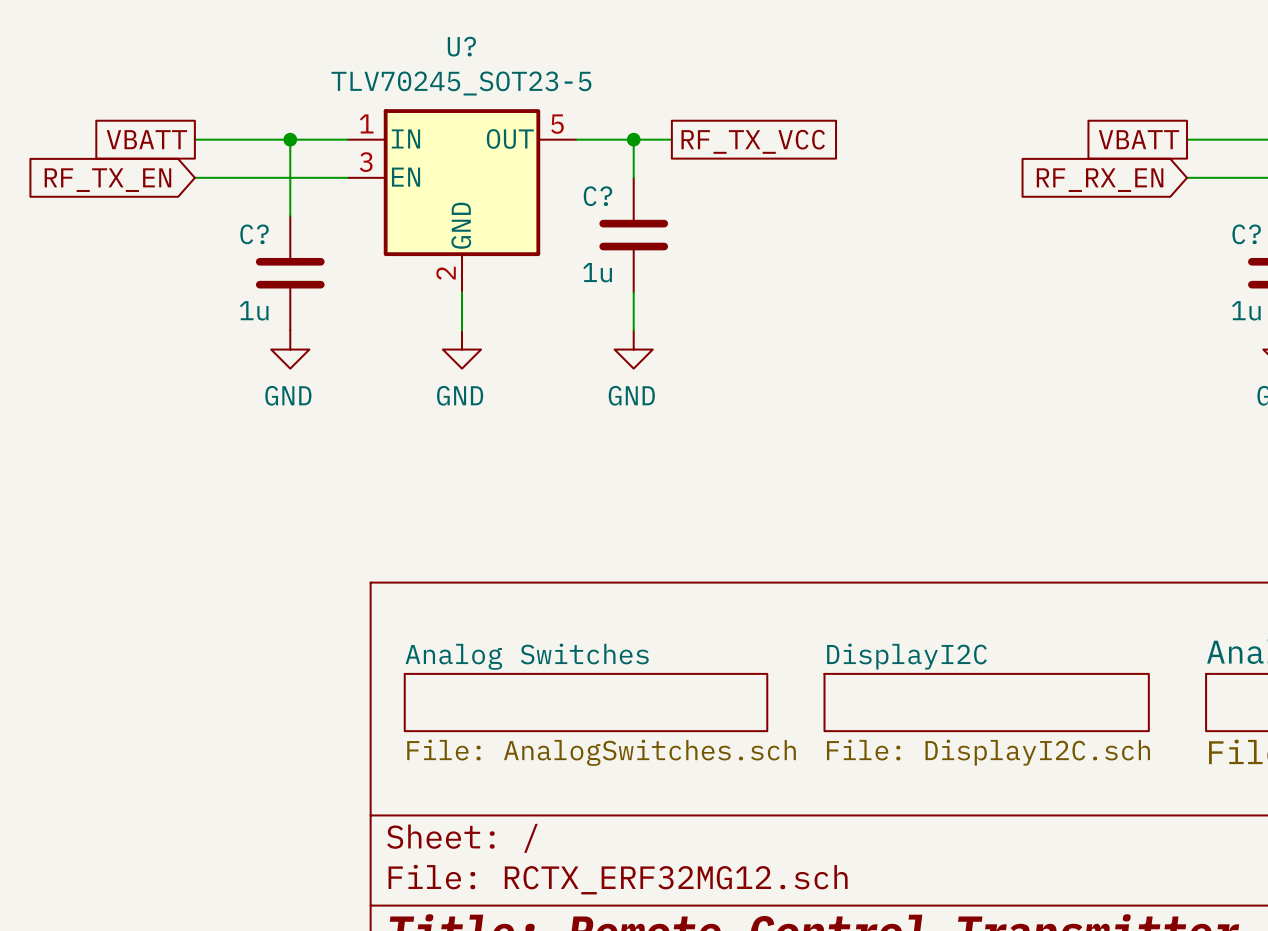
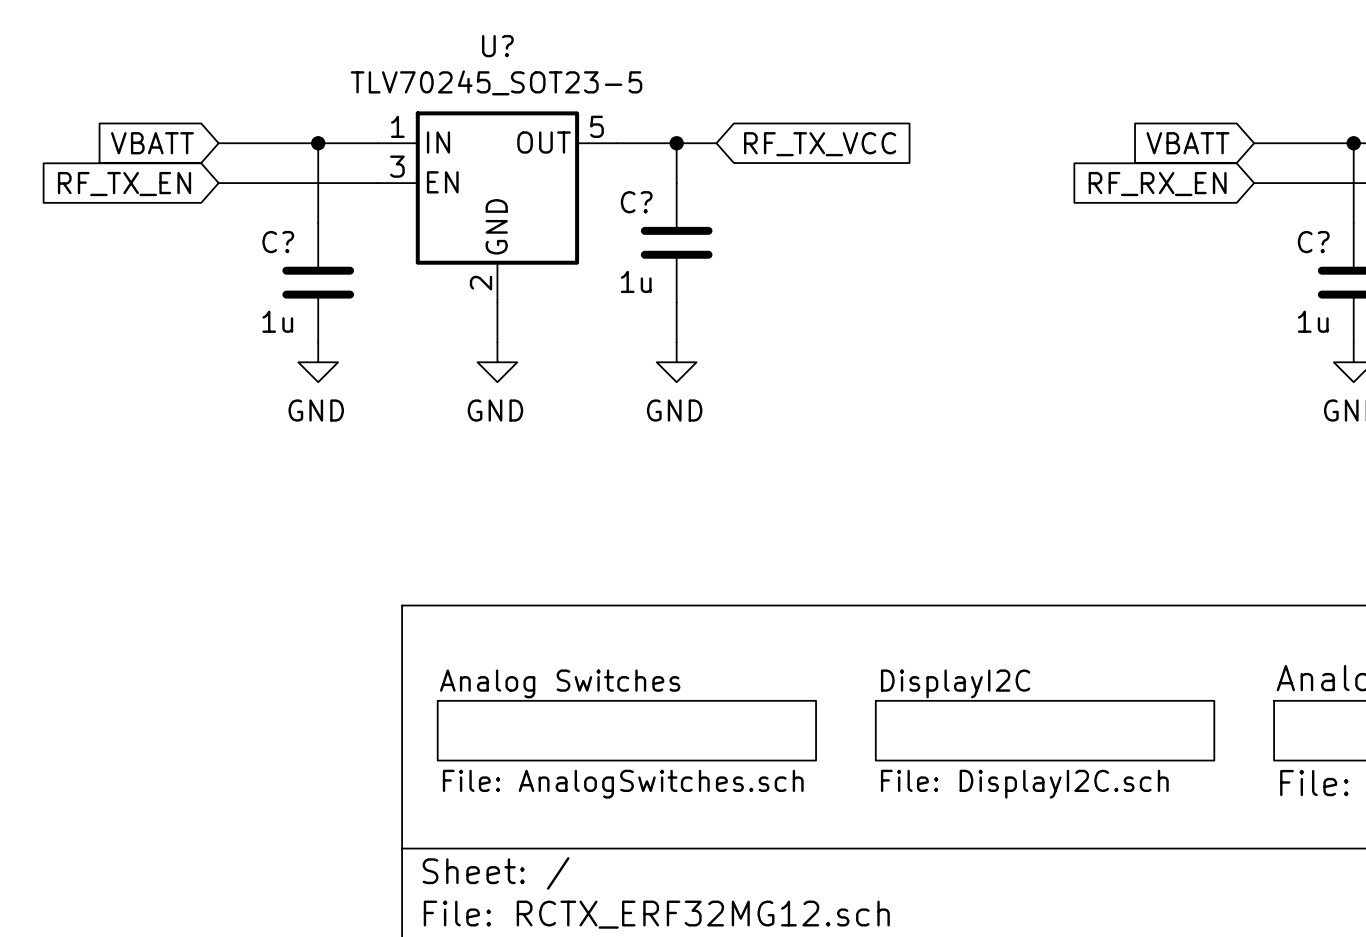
global label shape: passive (146, 139) -> input (152, 143)
global label shape: passive (1139, 139) -> input (1187, 143)
global label shape: passive (753, 141) -> input (820, 144)

